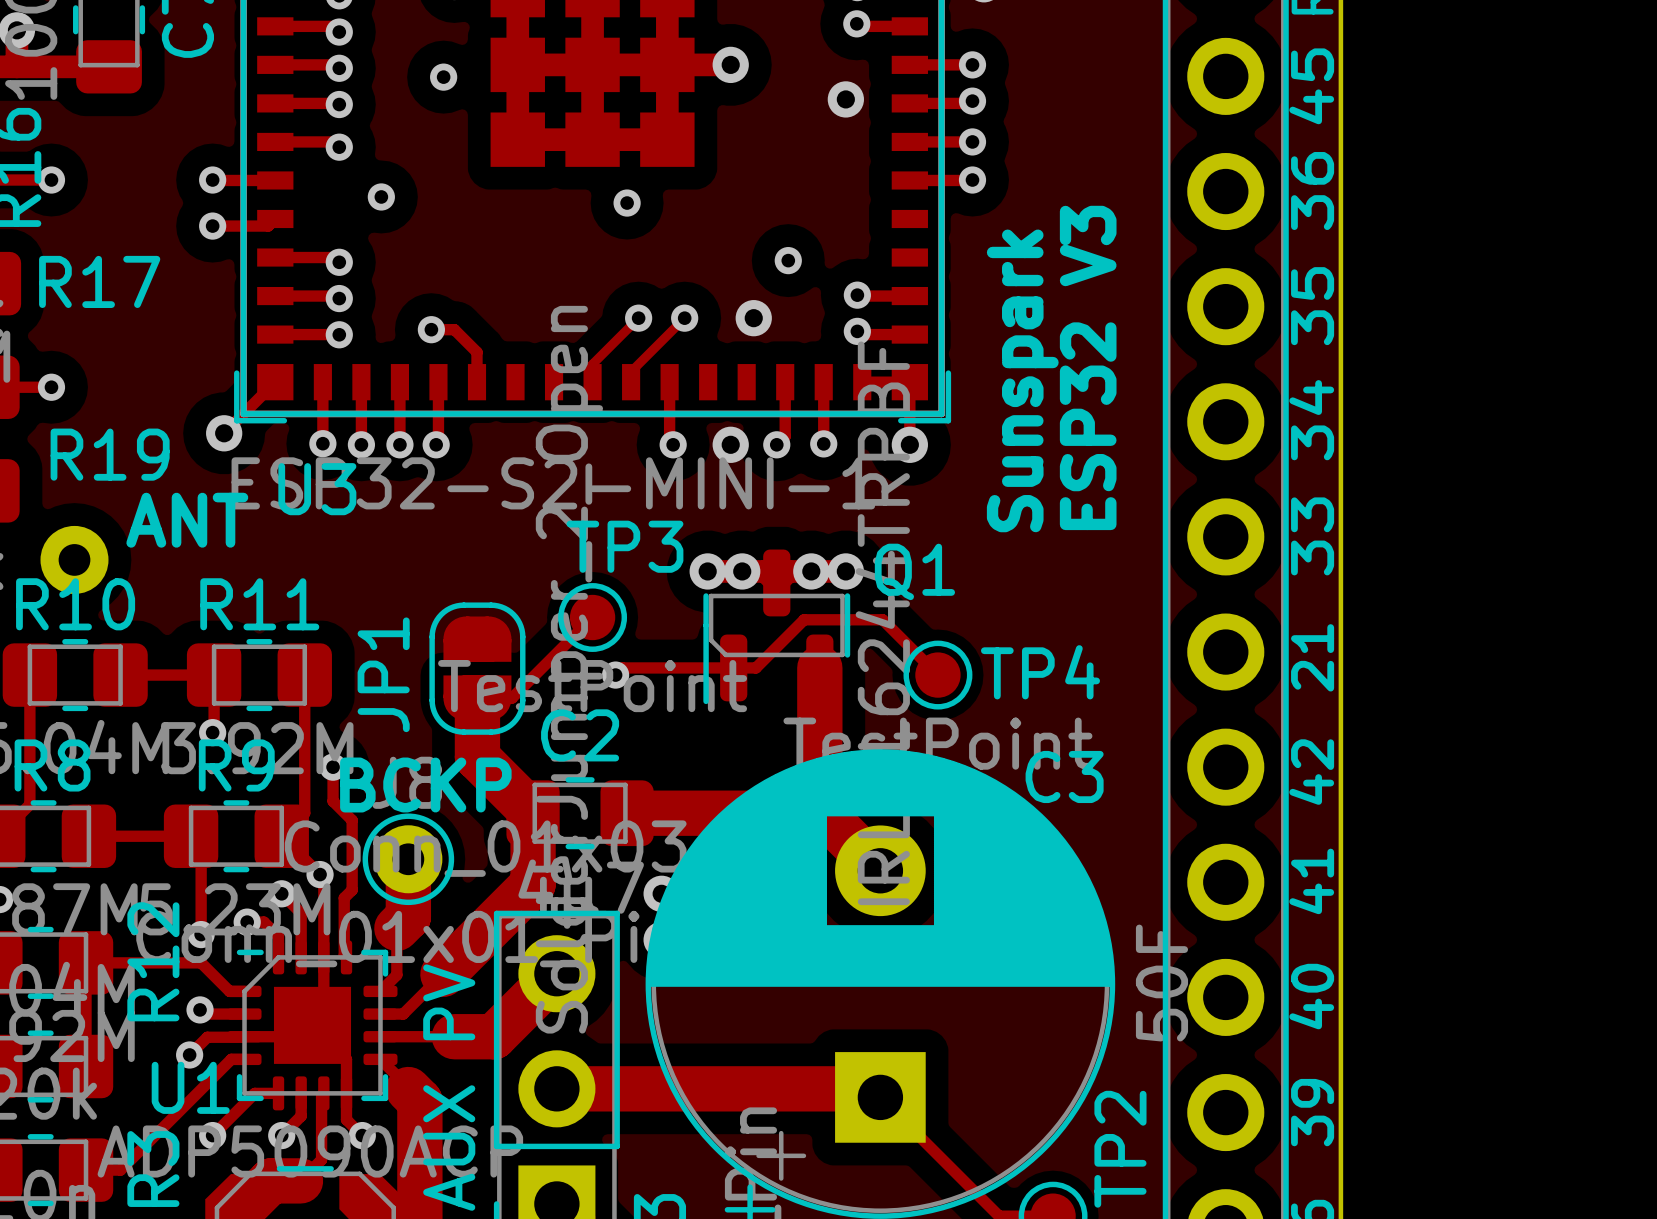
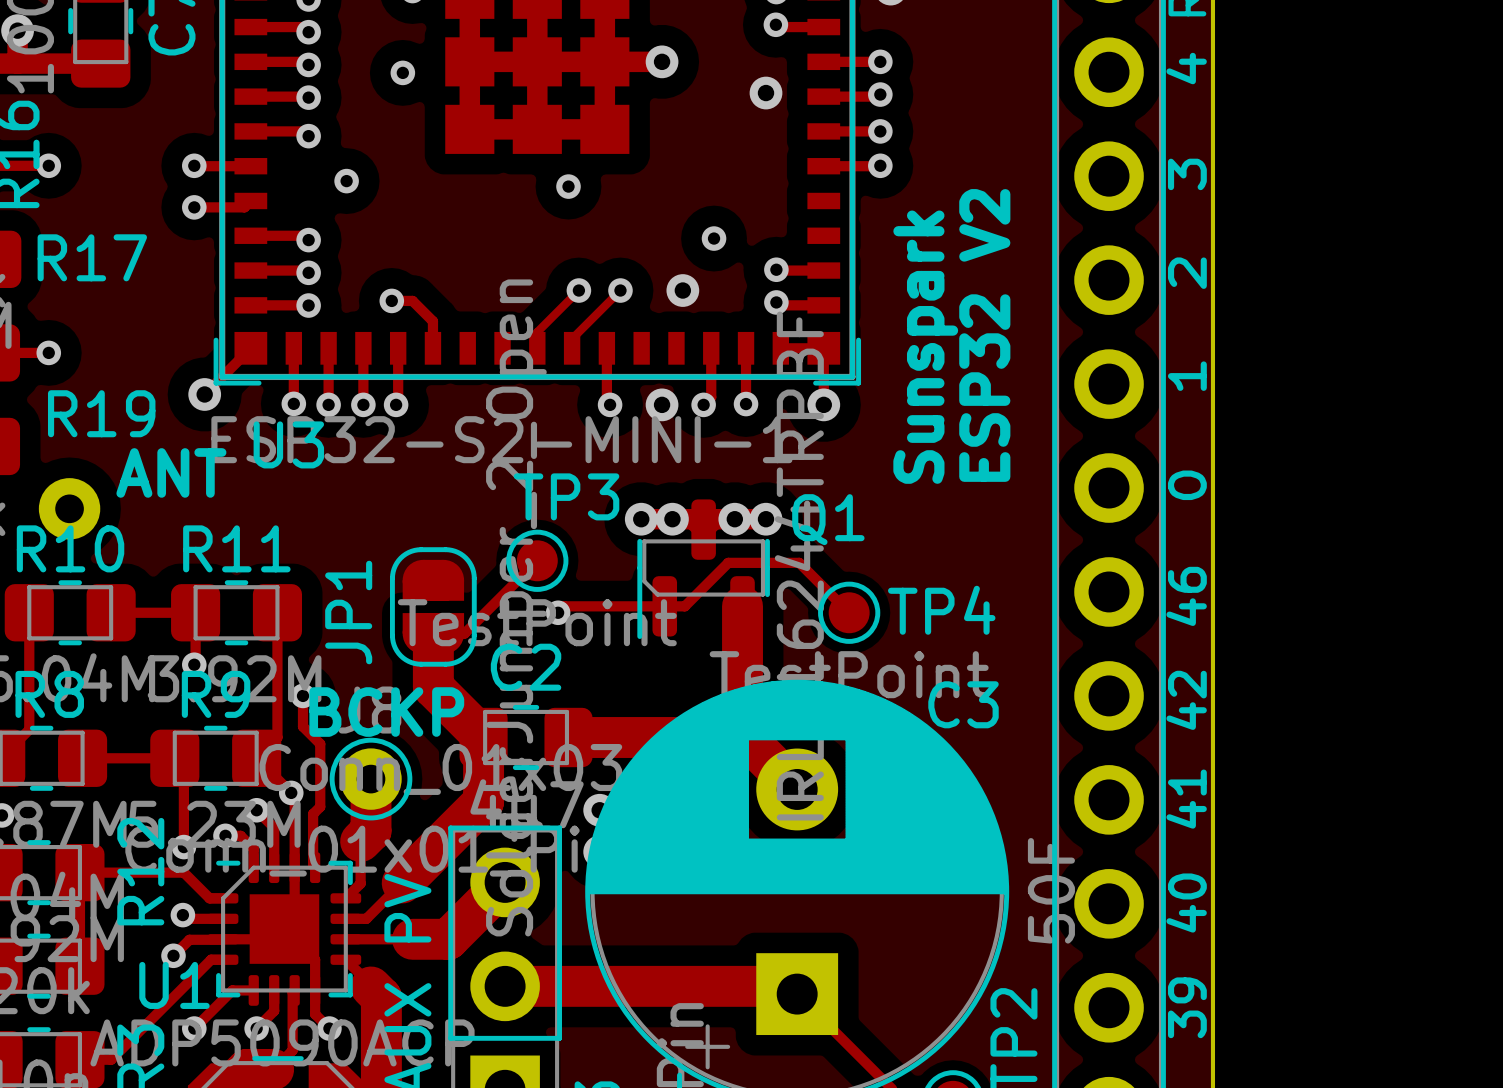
text: 45 (1311, 86) -> 4 (1186, 68)
text: 36 (1312, 191) -> 3 (1187, 174)
text: 35 (1312, 306) -> 2 (1187, 273)
text: ESP32 V3 (1088, 367) -> ESP32 V2 (984, 335)
text: 34 (1311, 420) -> 1 (1187, 376)
text: 33 (1312, 536) -> 0 (1187, 485)
text: 21 (1312, 657) -> 46 (1186, 596)

